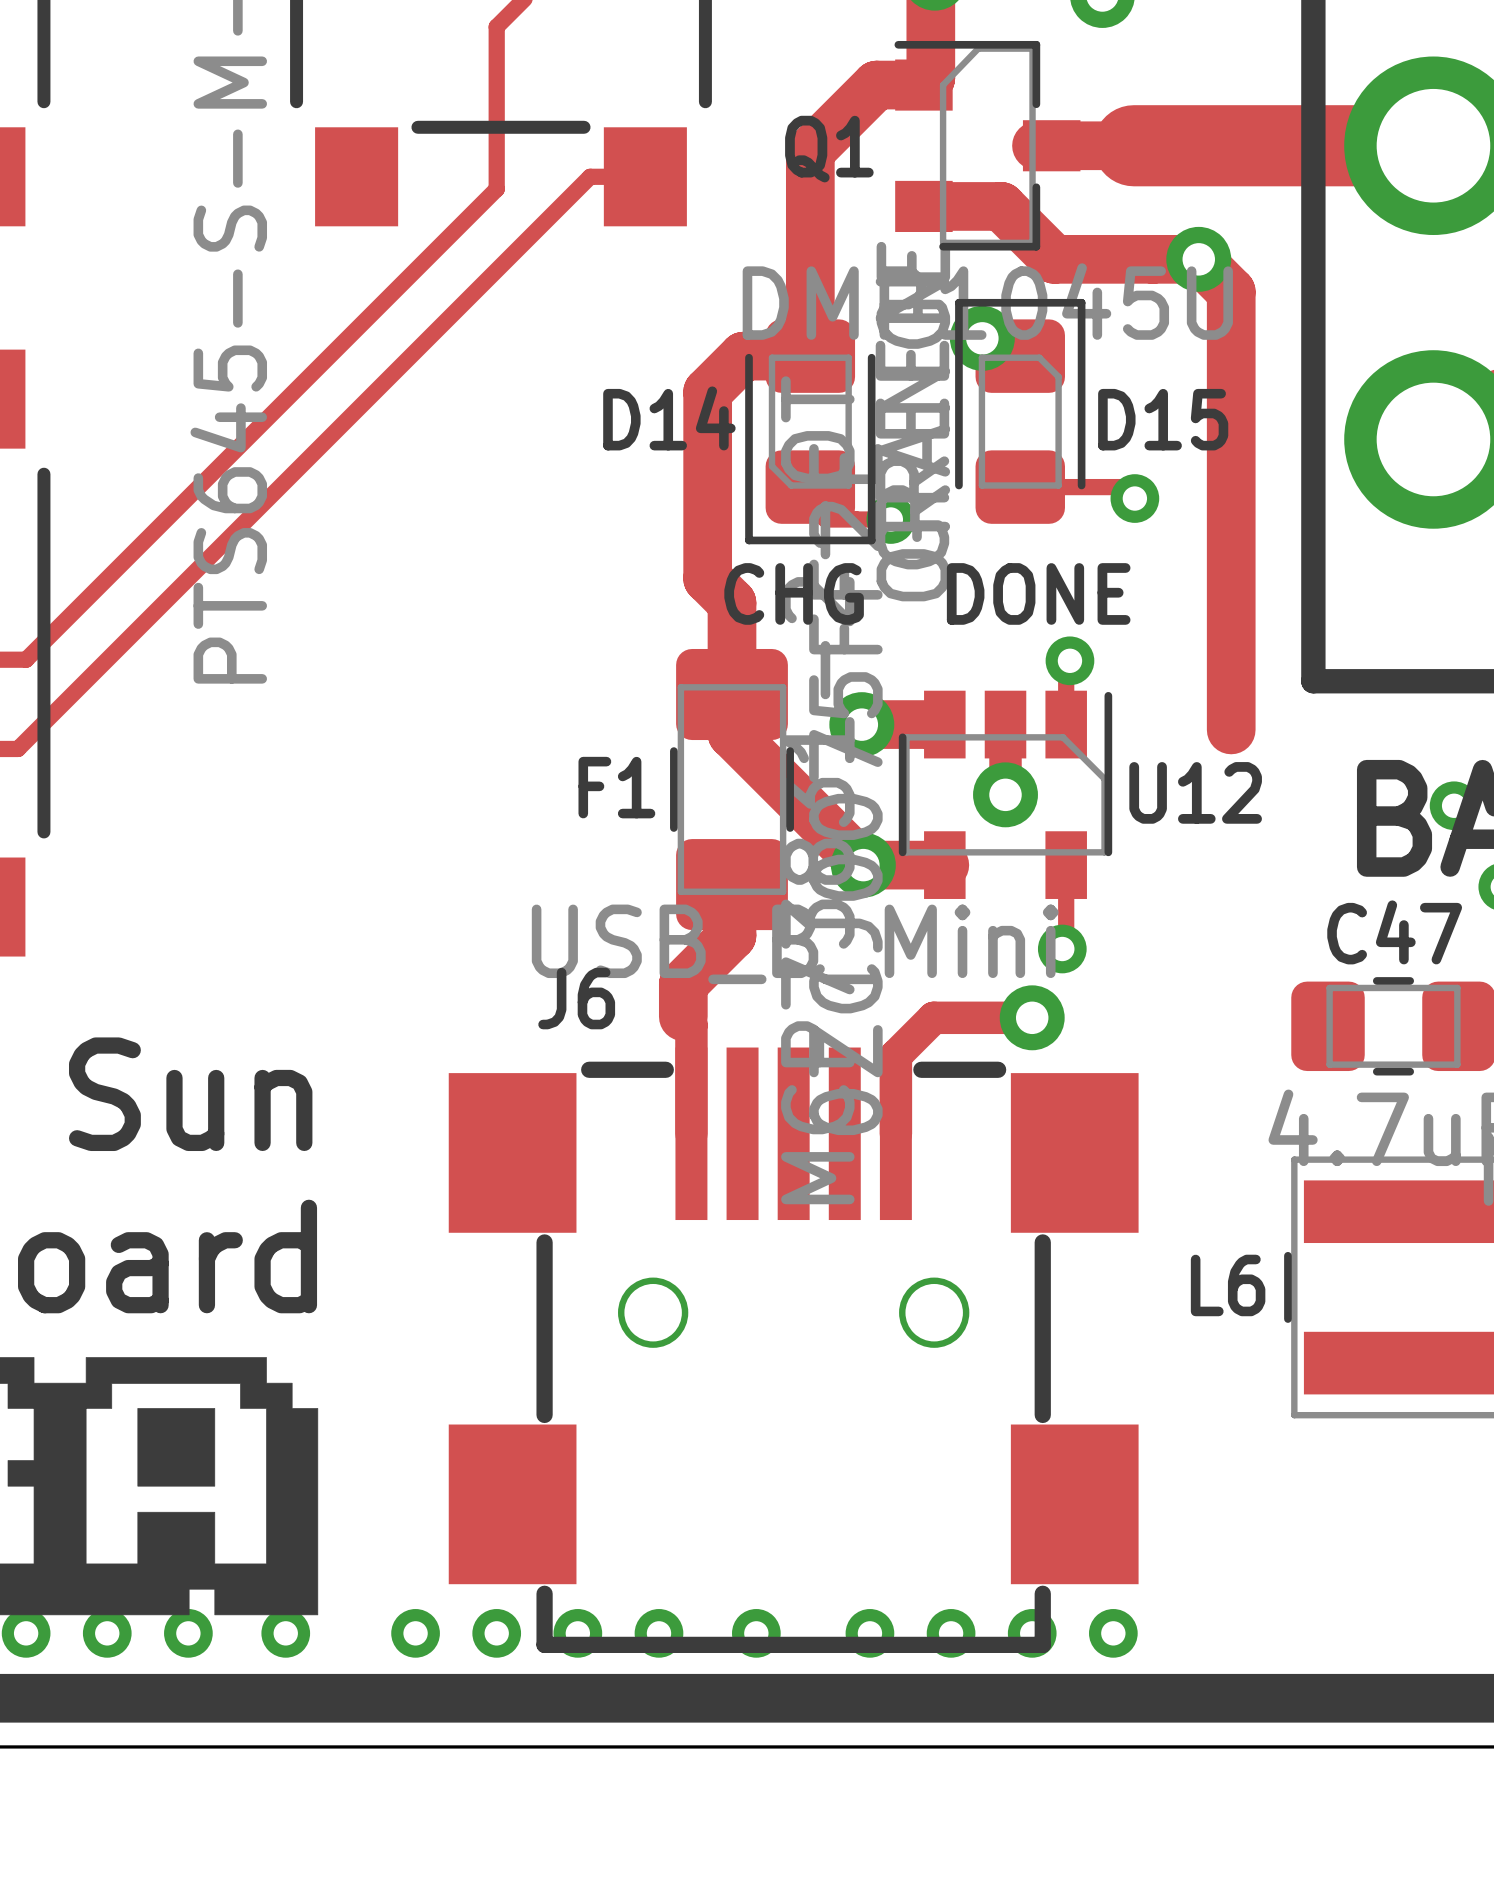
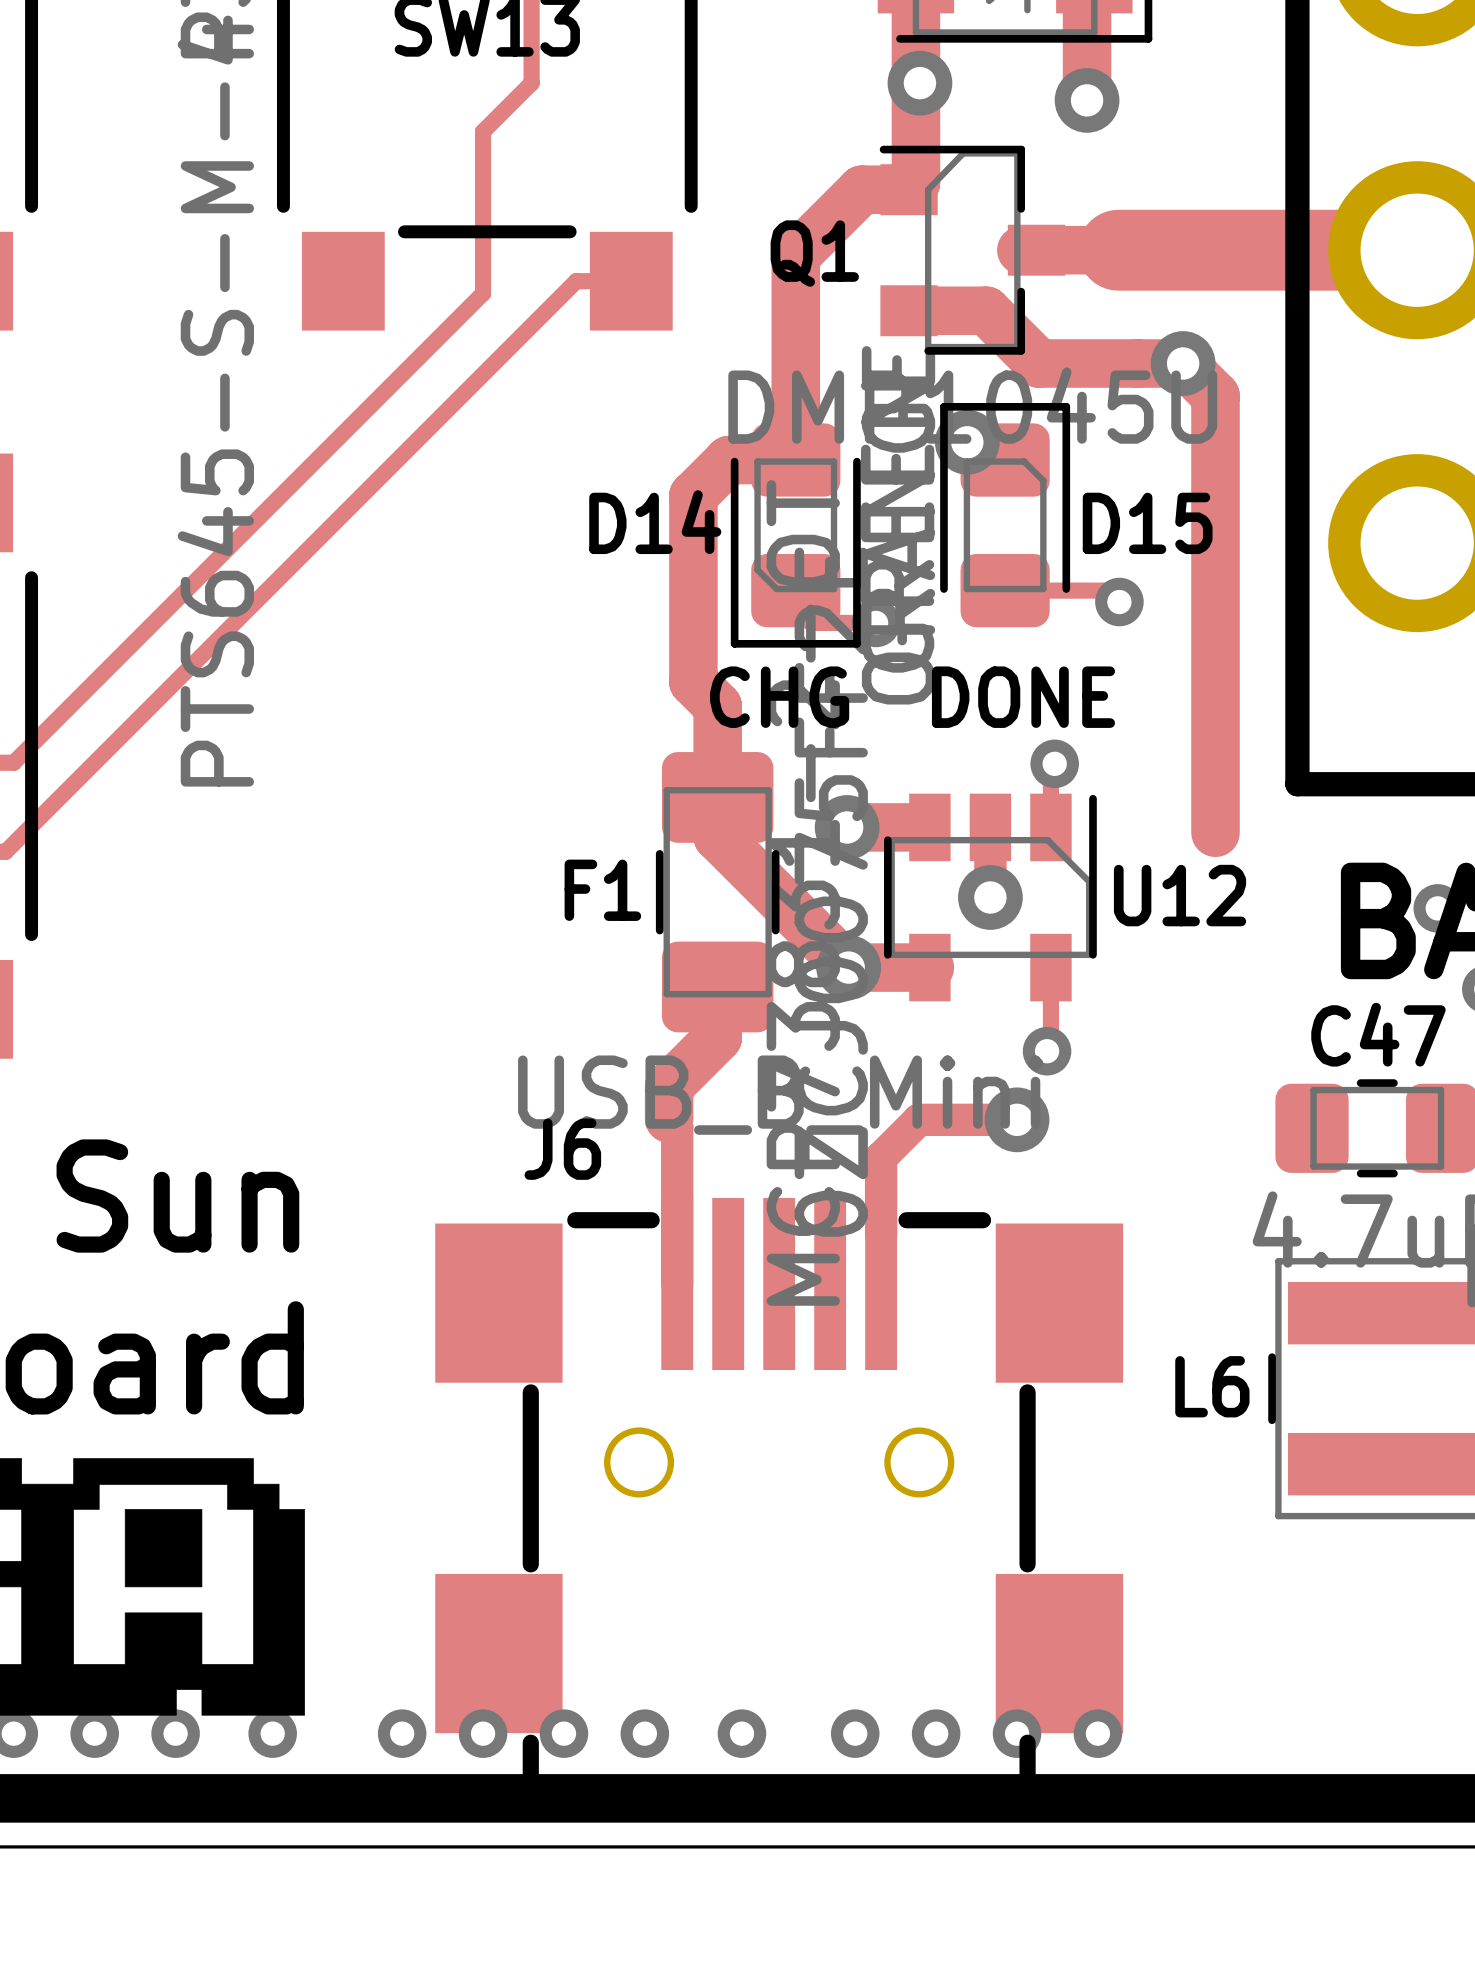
J6 position: (793, 1350) -> (779, 1499)

